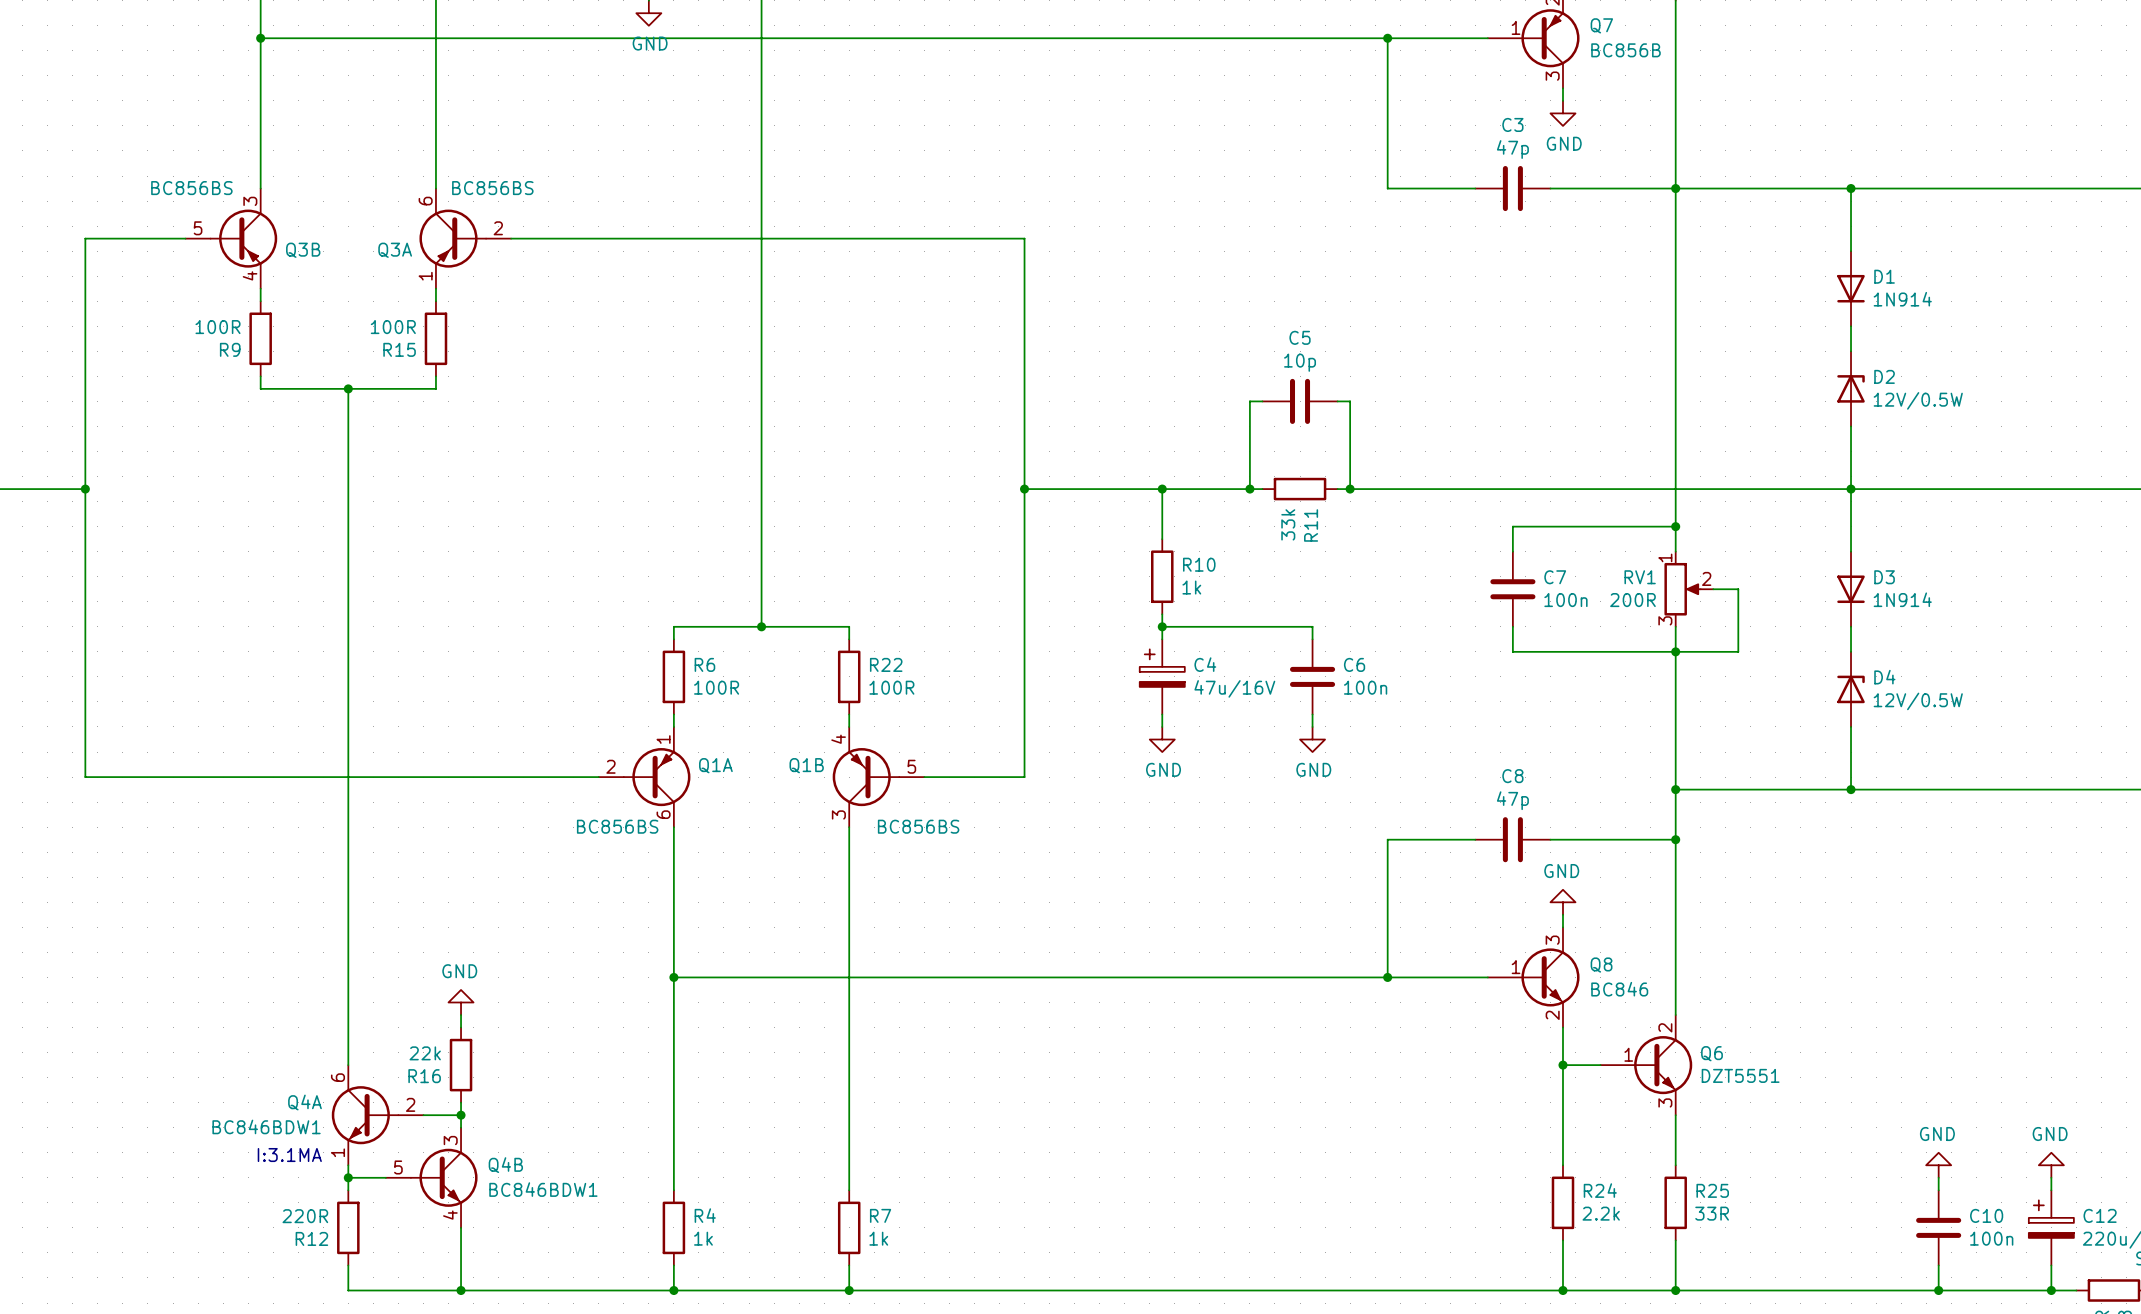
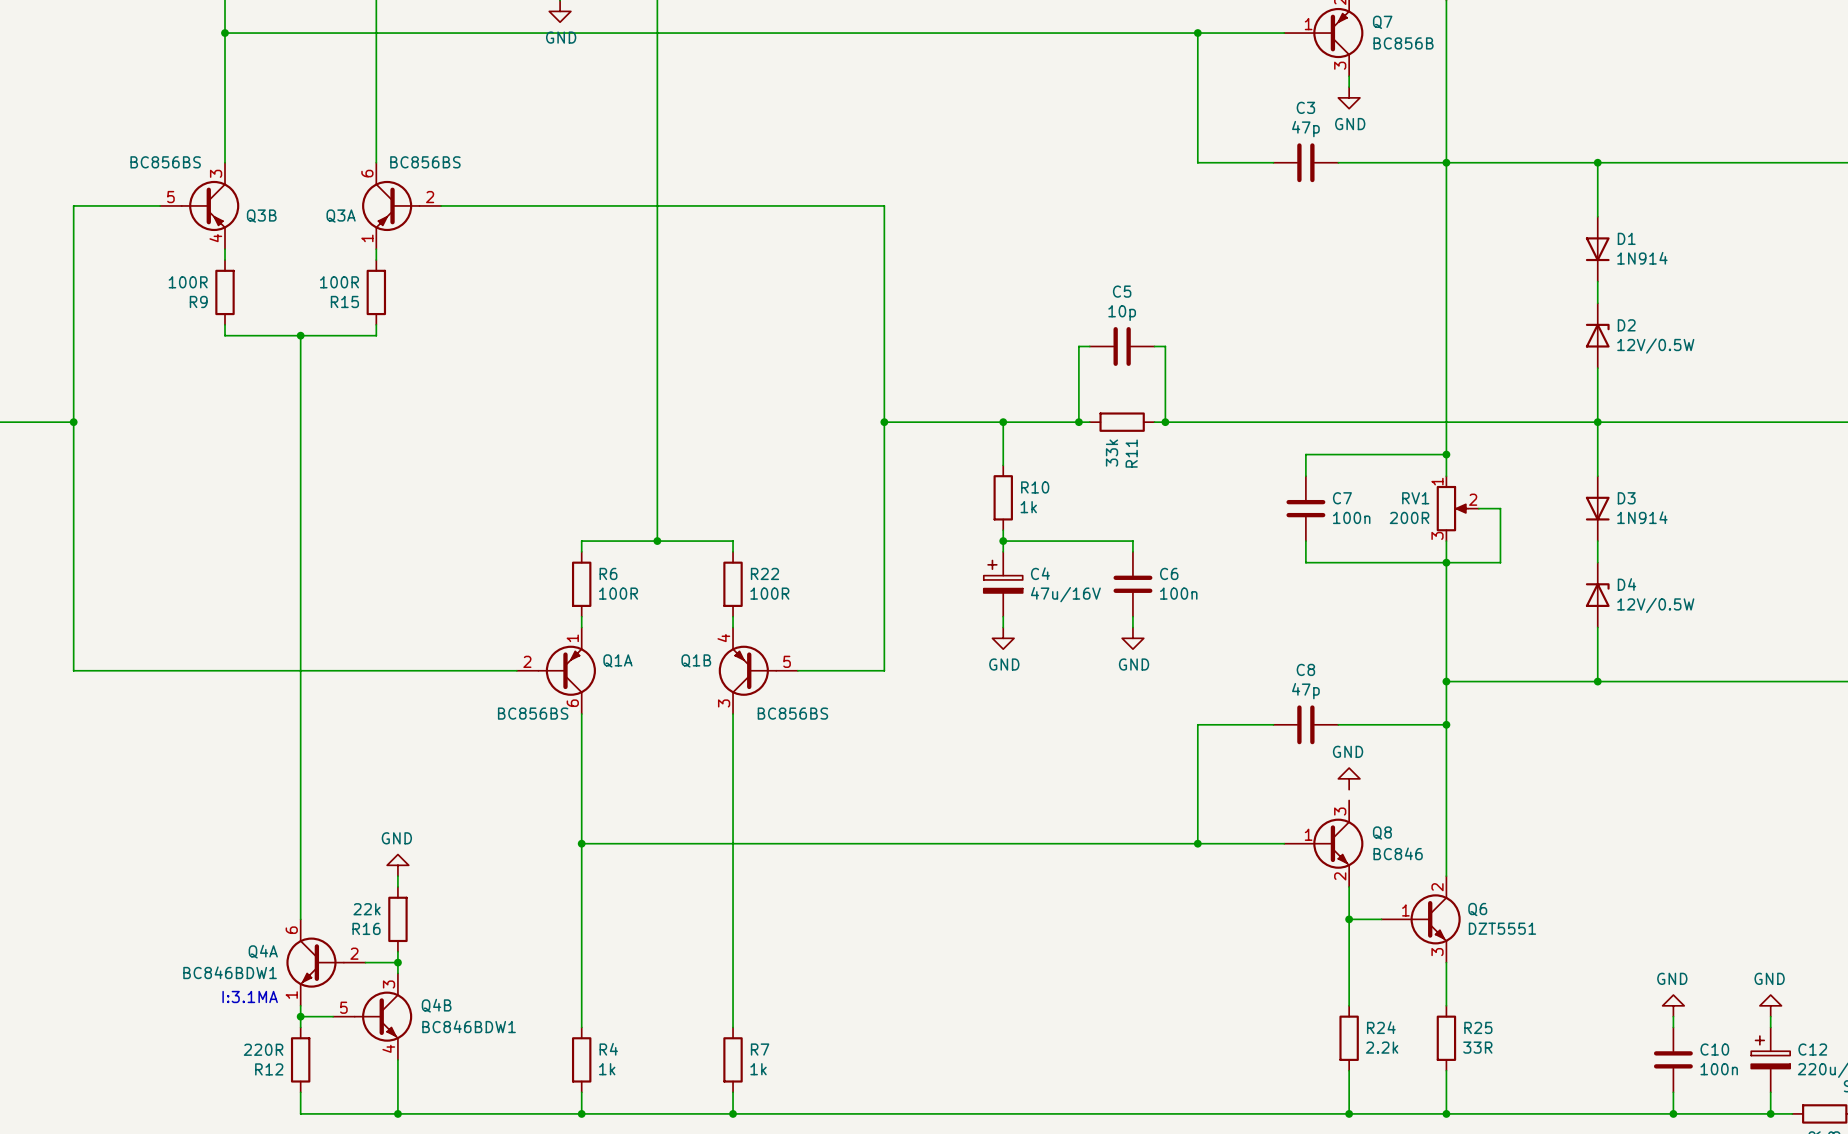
wire: (1562, 914) (1562, 927) -> none

